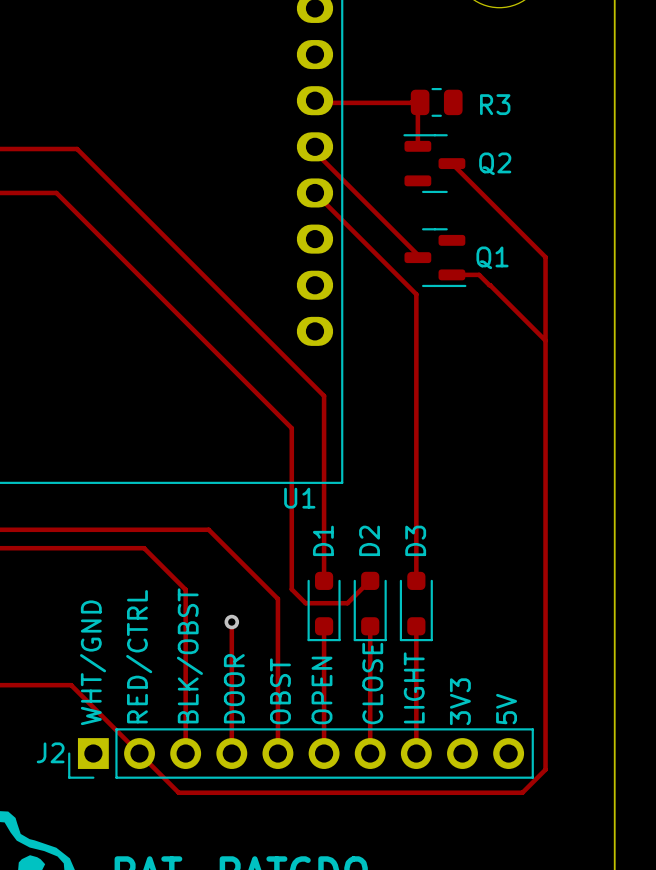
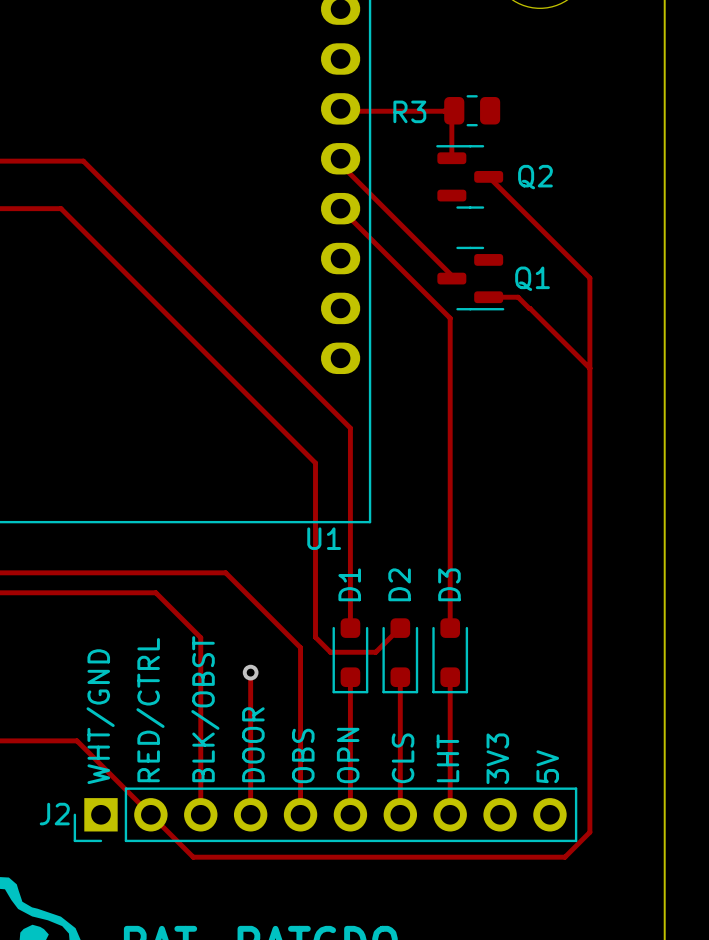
R3 name position: R3 (495, 104) -> R3 (409, 111)
text: CLOSE (372, 683) -> CLS (403, 758)
text: LIGHT (414, 687) -> LHT (447, 758)
text: OPEN (322, 690) -> OPN (348, 755)
text: OBST (280, 691) -> OBS (303, 755)

